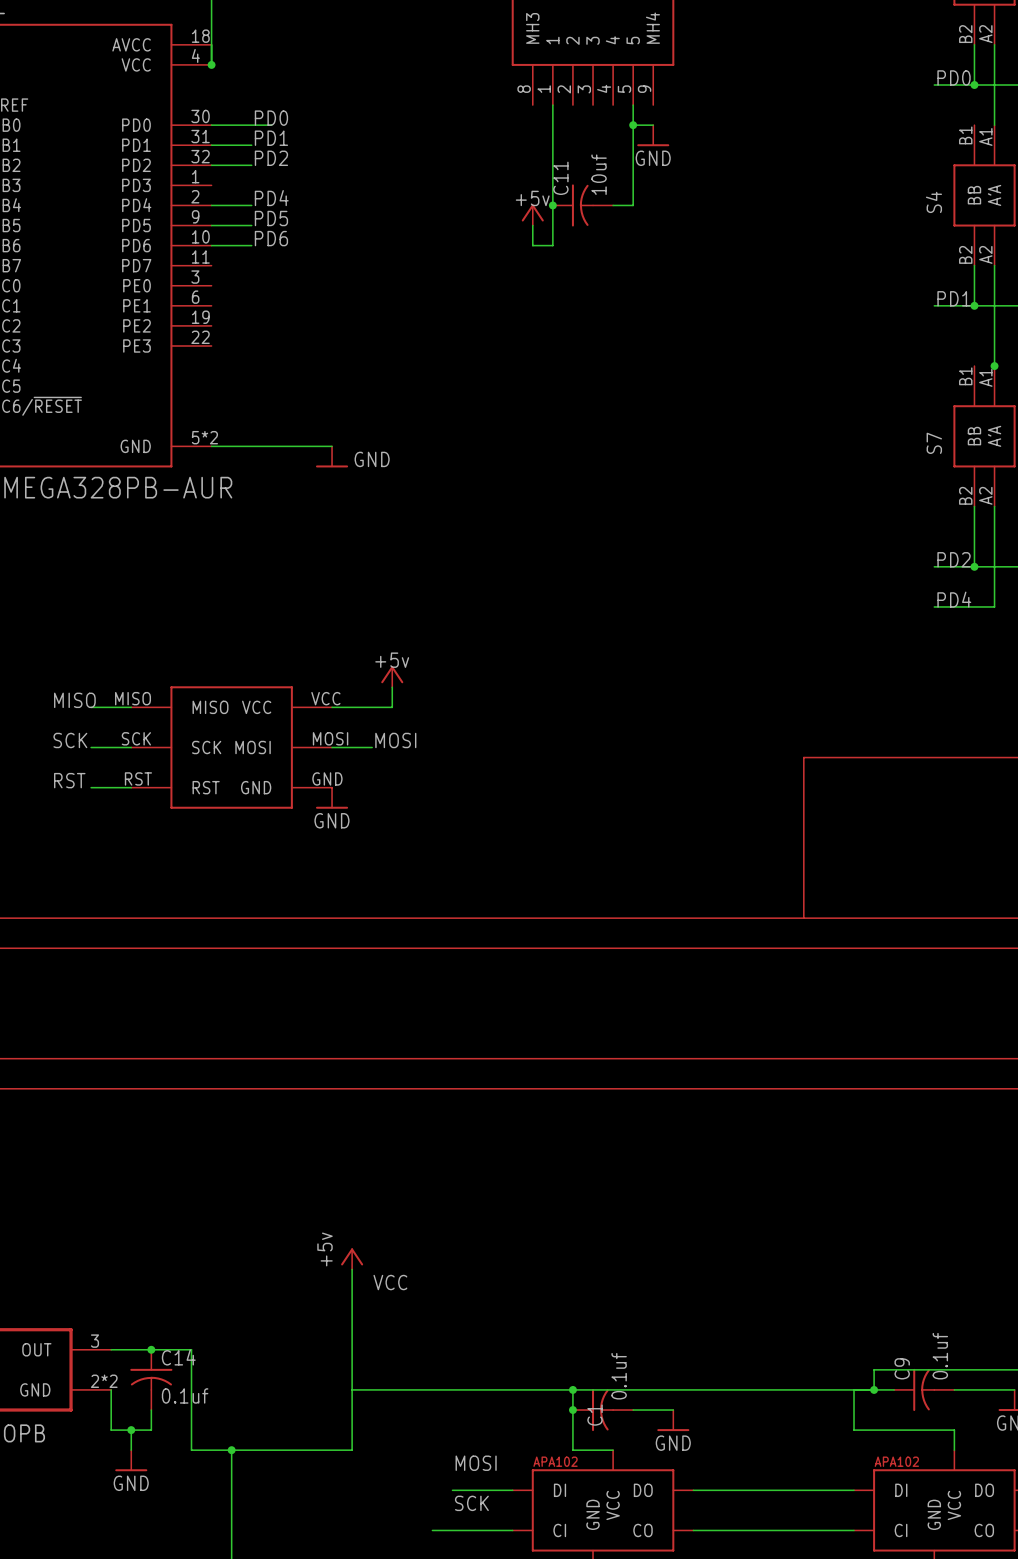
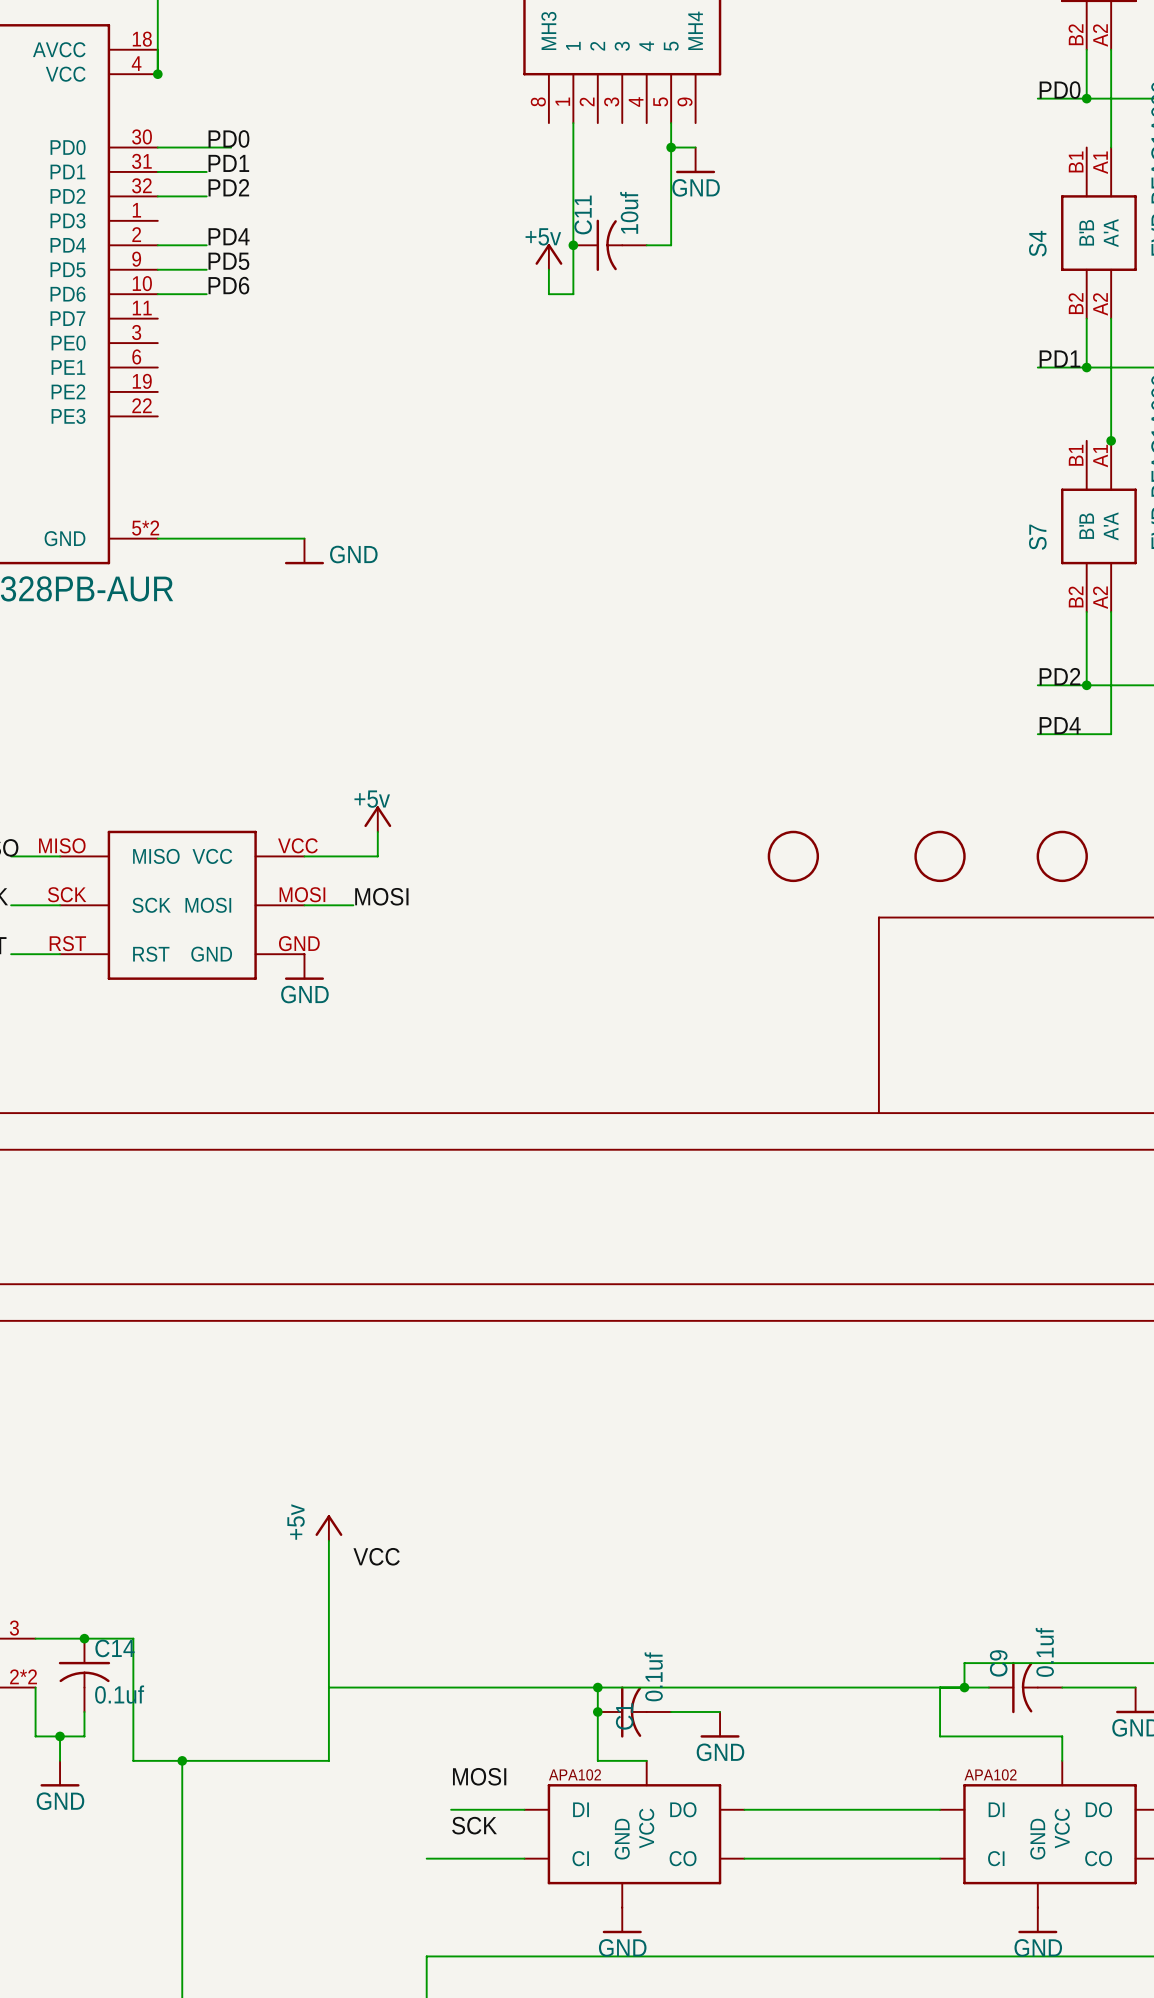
part: none -> (793, 856)
part: none -> (940, 856)
part: none -> (1062, 856)

